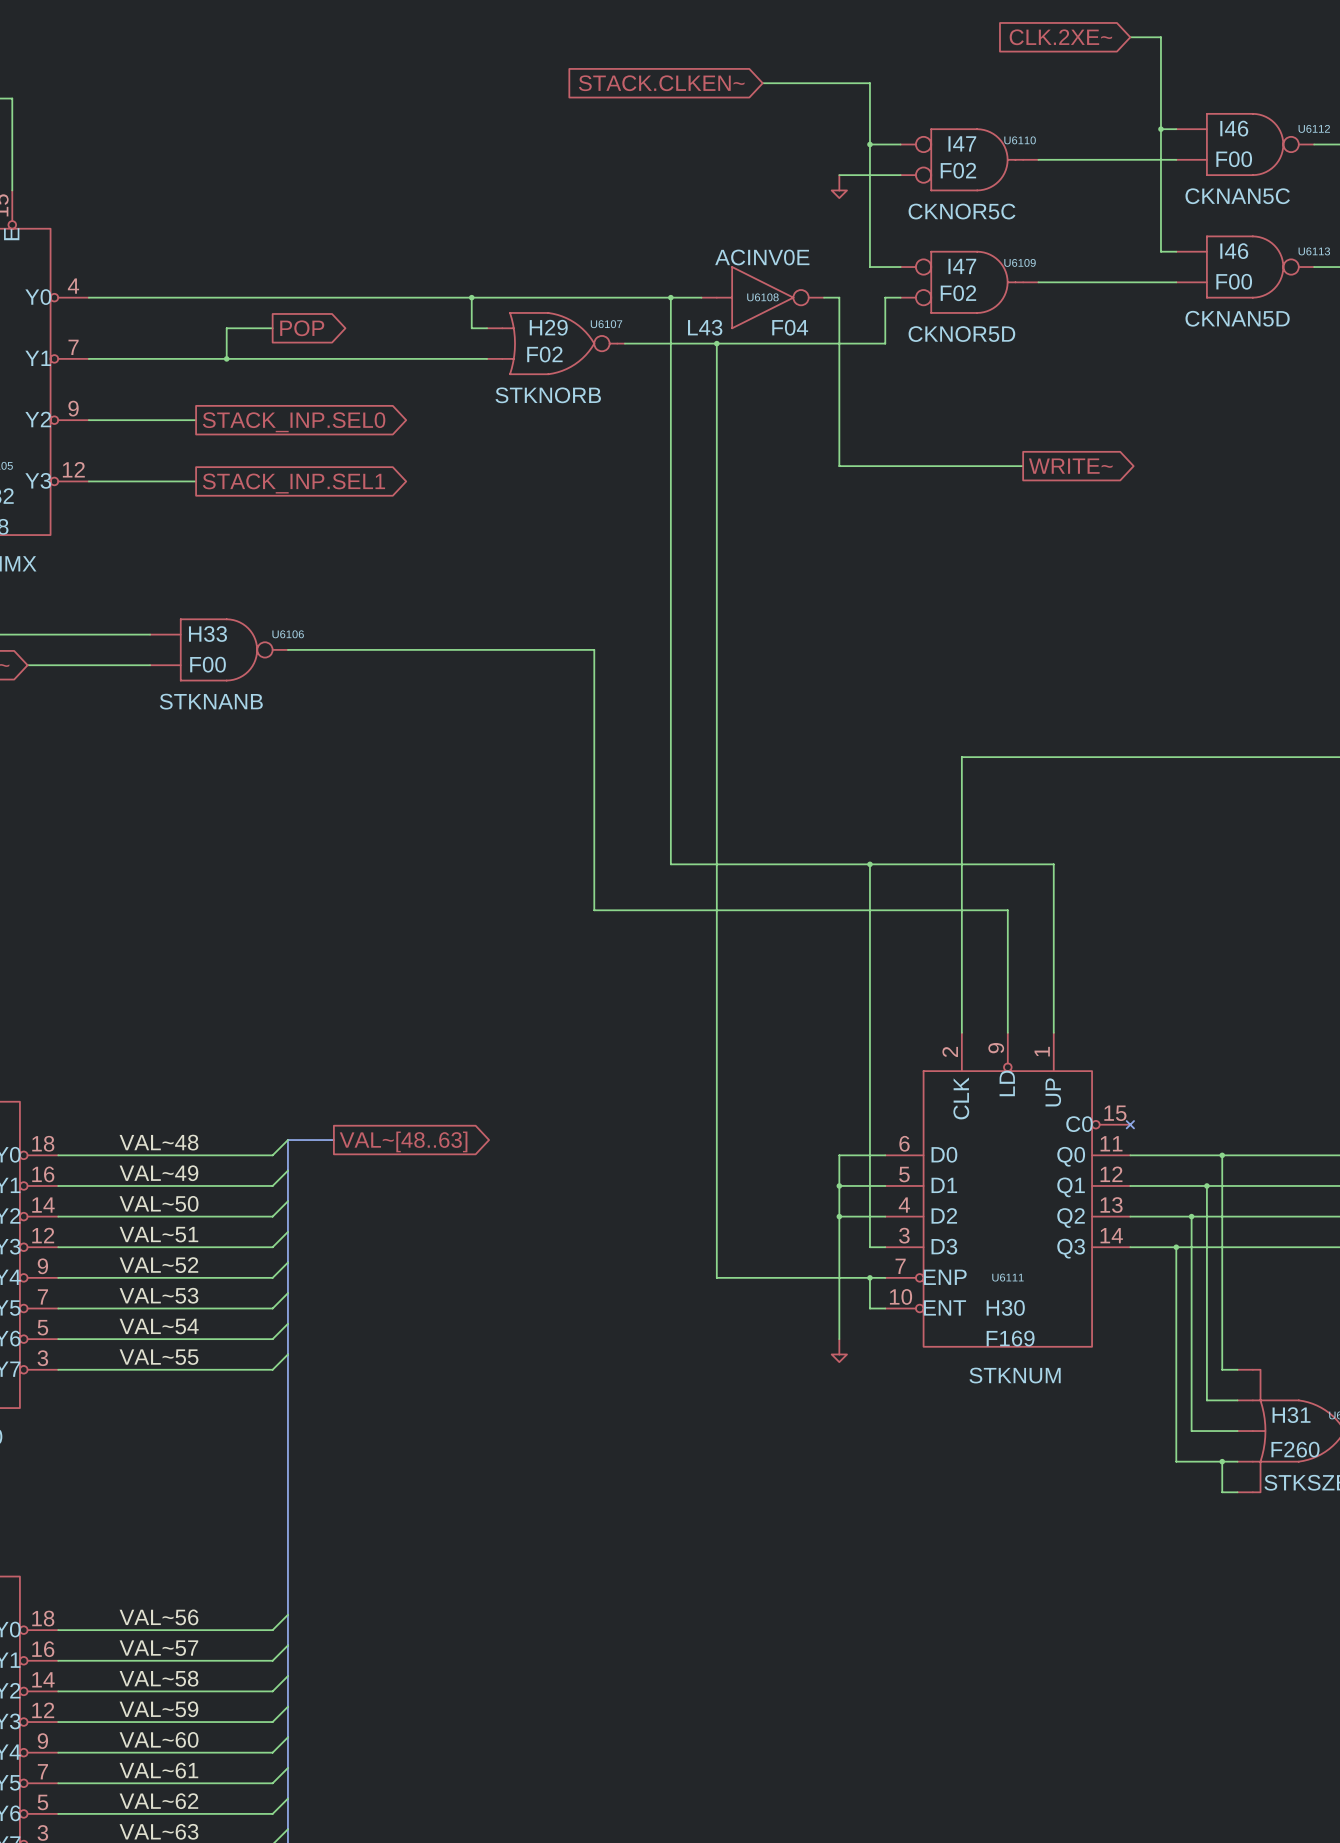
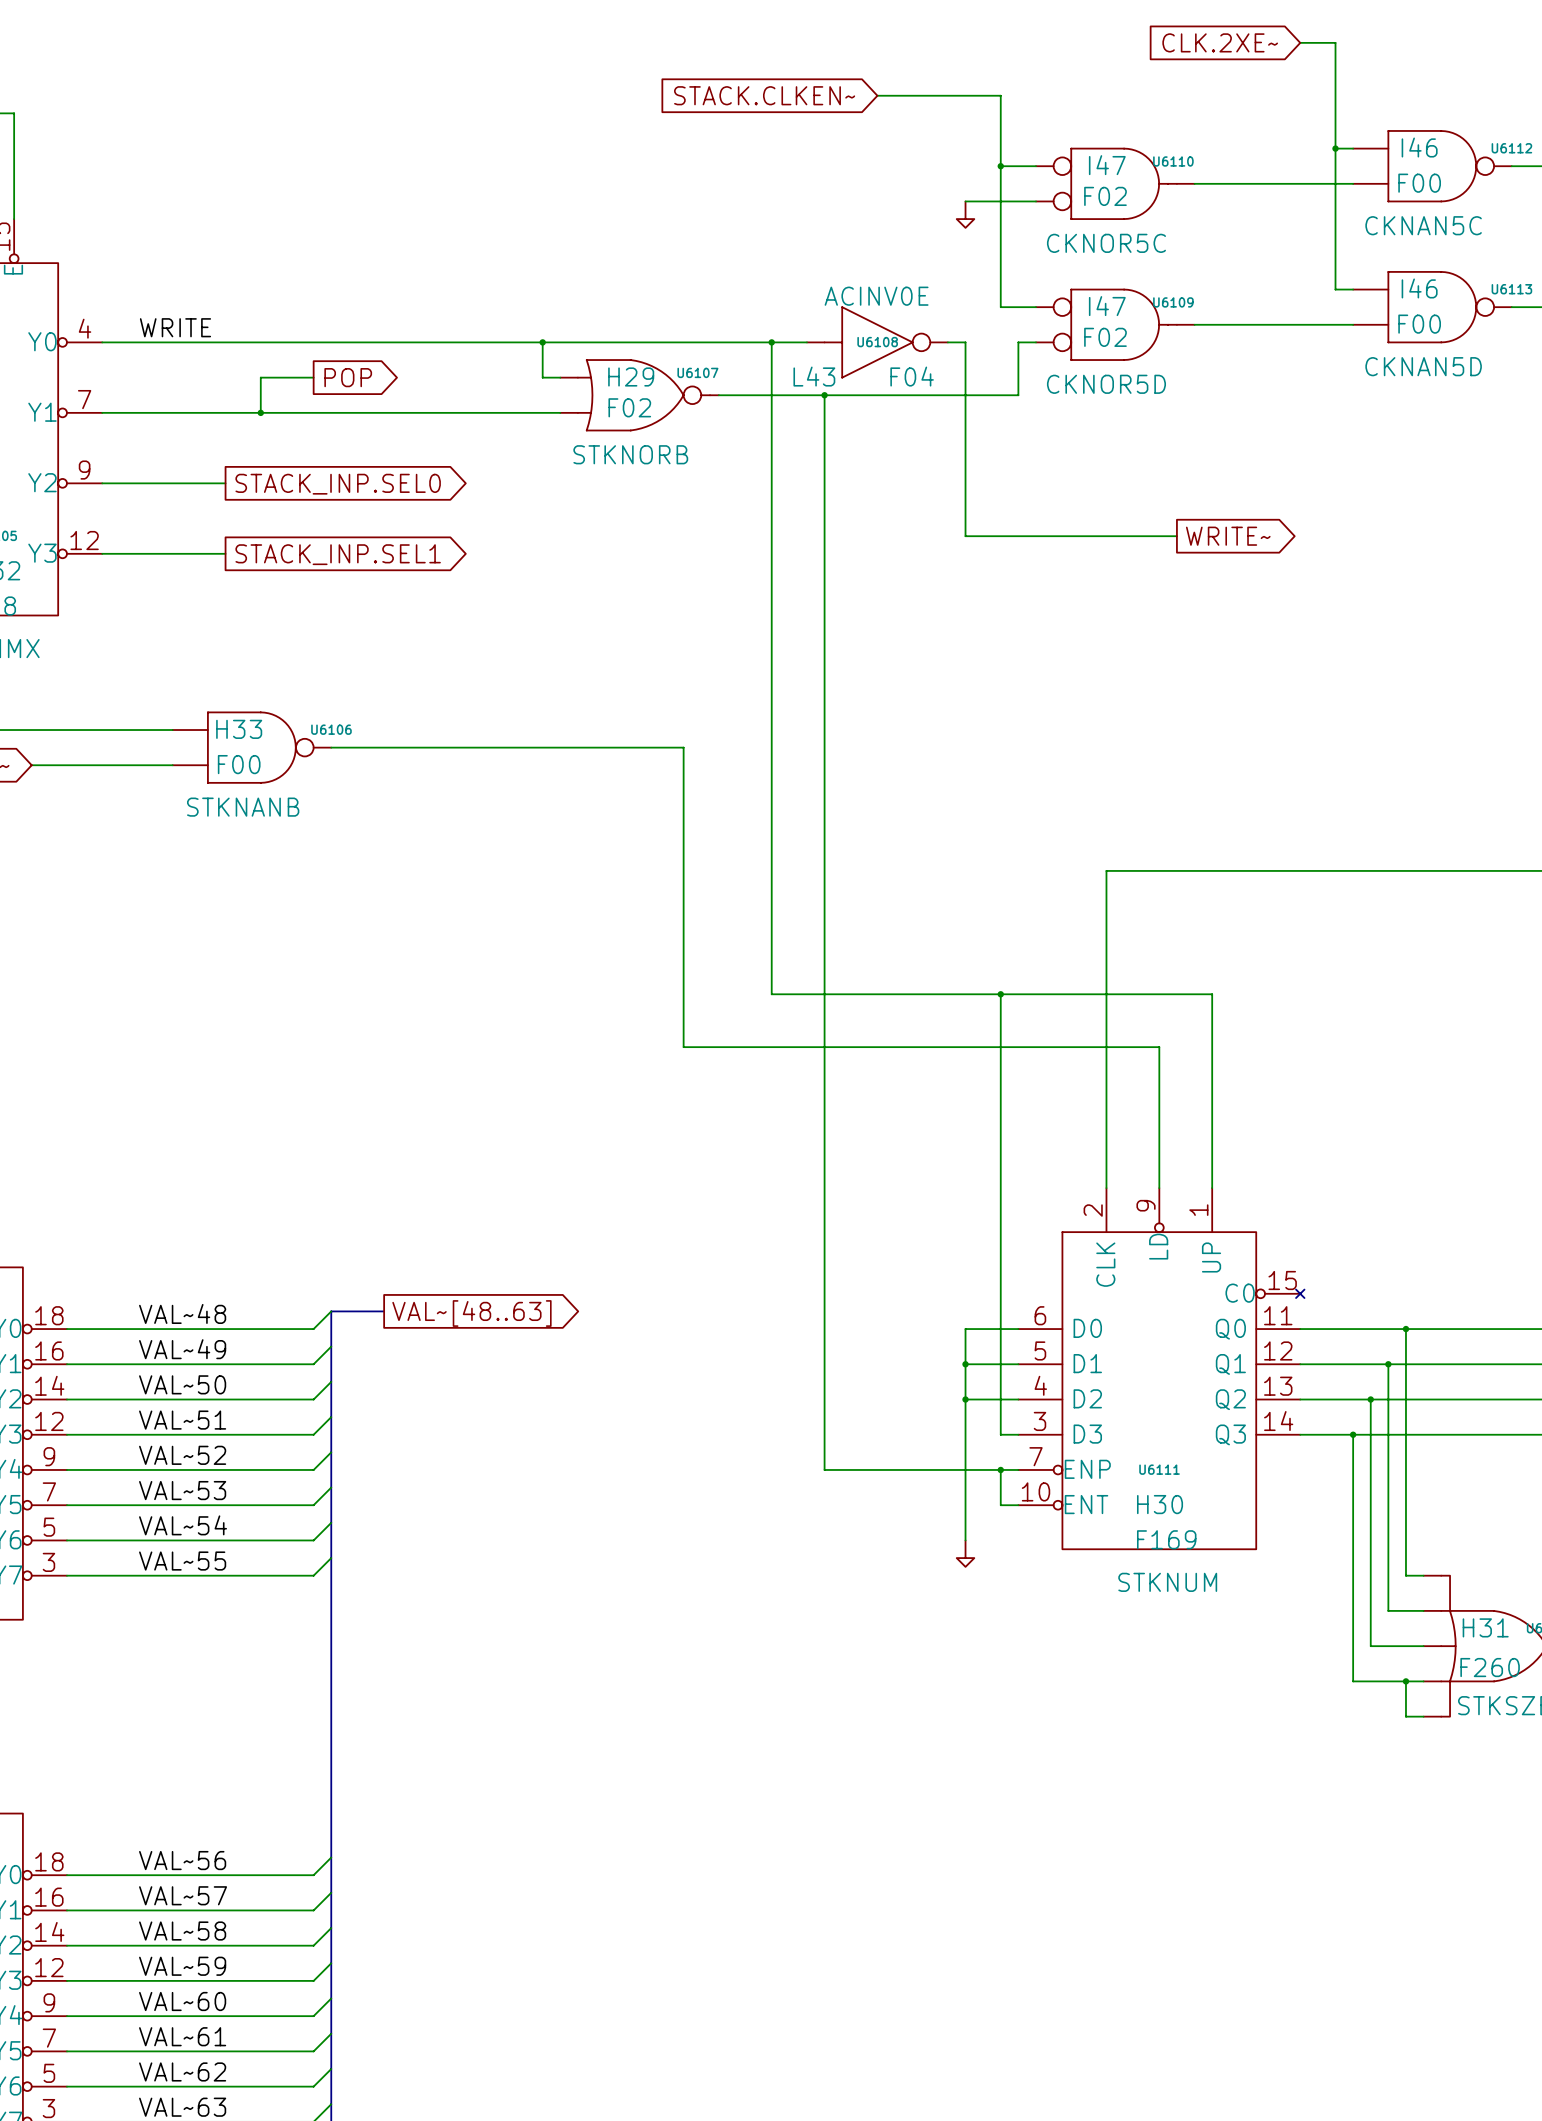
label: none -> WRITE (175, 327)

